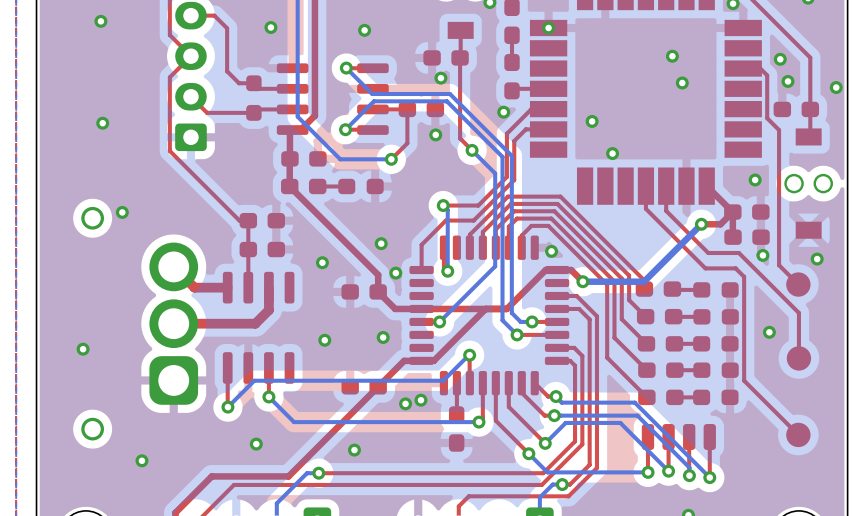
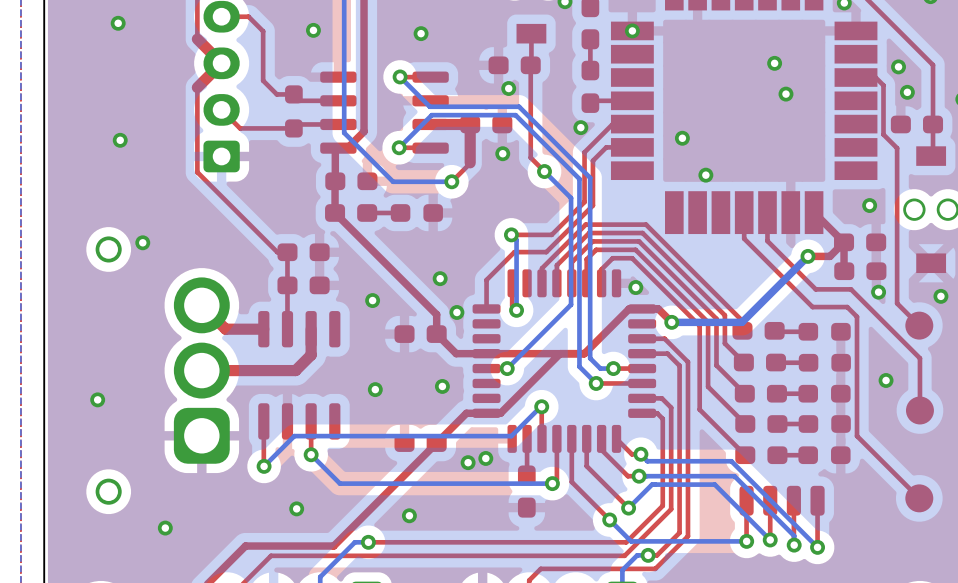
top track width: thin (169, 35) (190, 56) (169, 77) -> thick (197, 39) (221, 63) (197, 87)
top track width: thin (372, 109) (407, 109) (407, 142) -> thick (430, 124) (470, 124) (470, 162)

